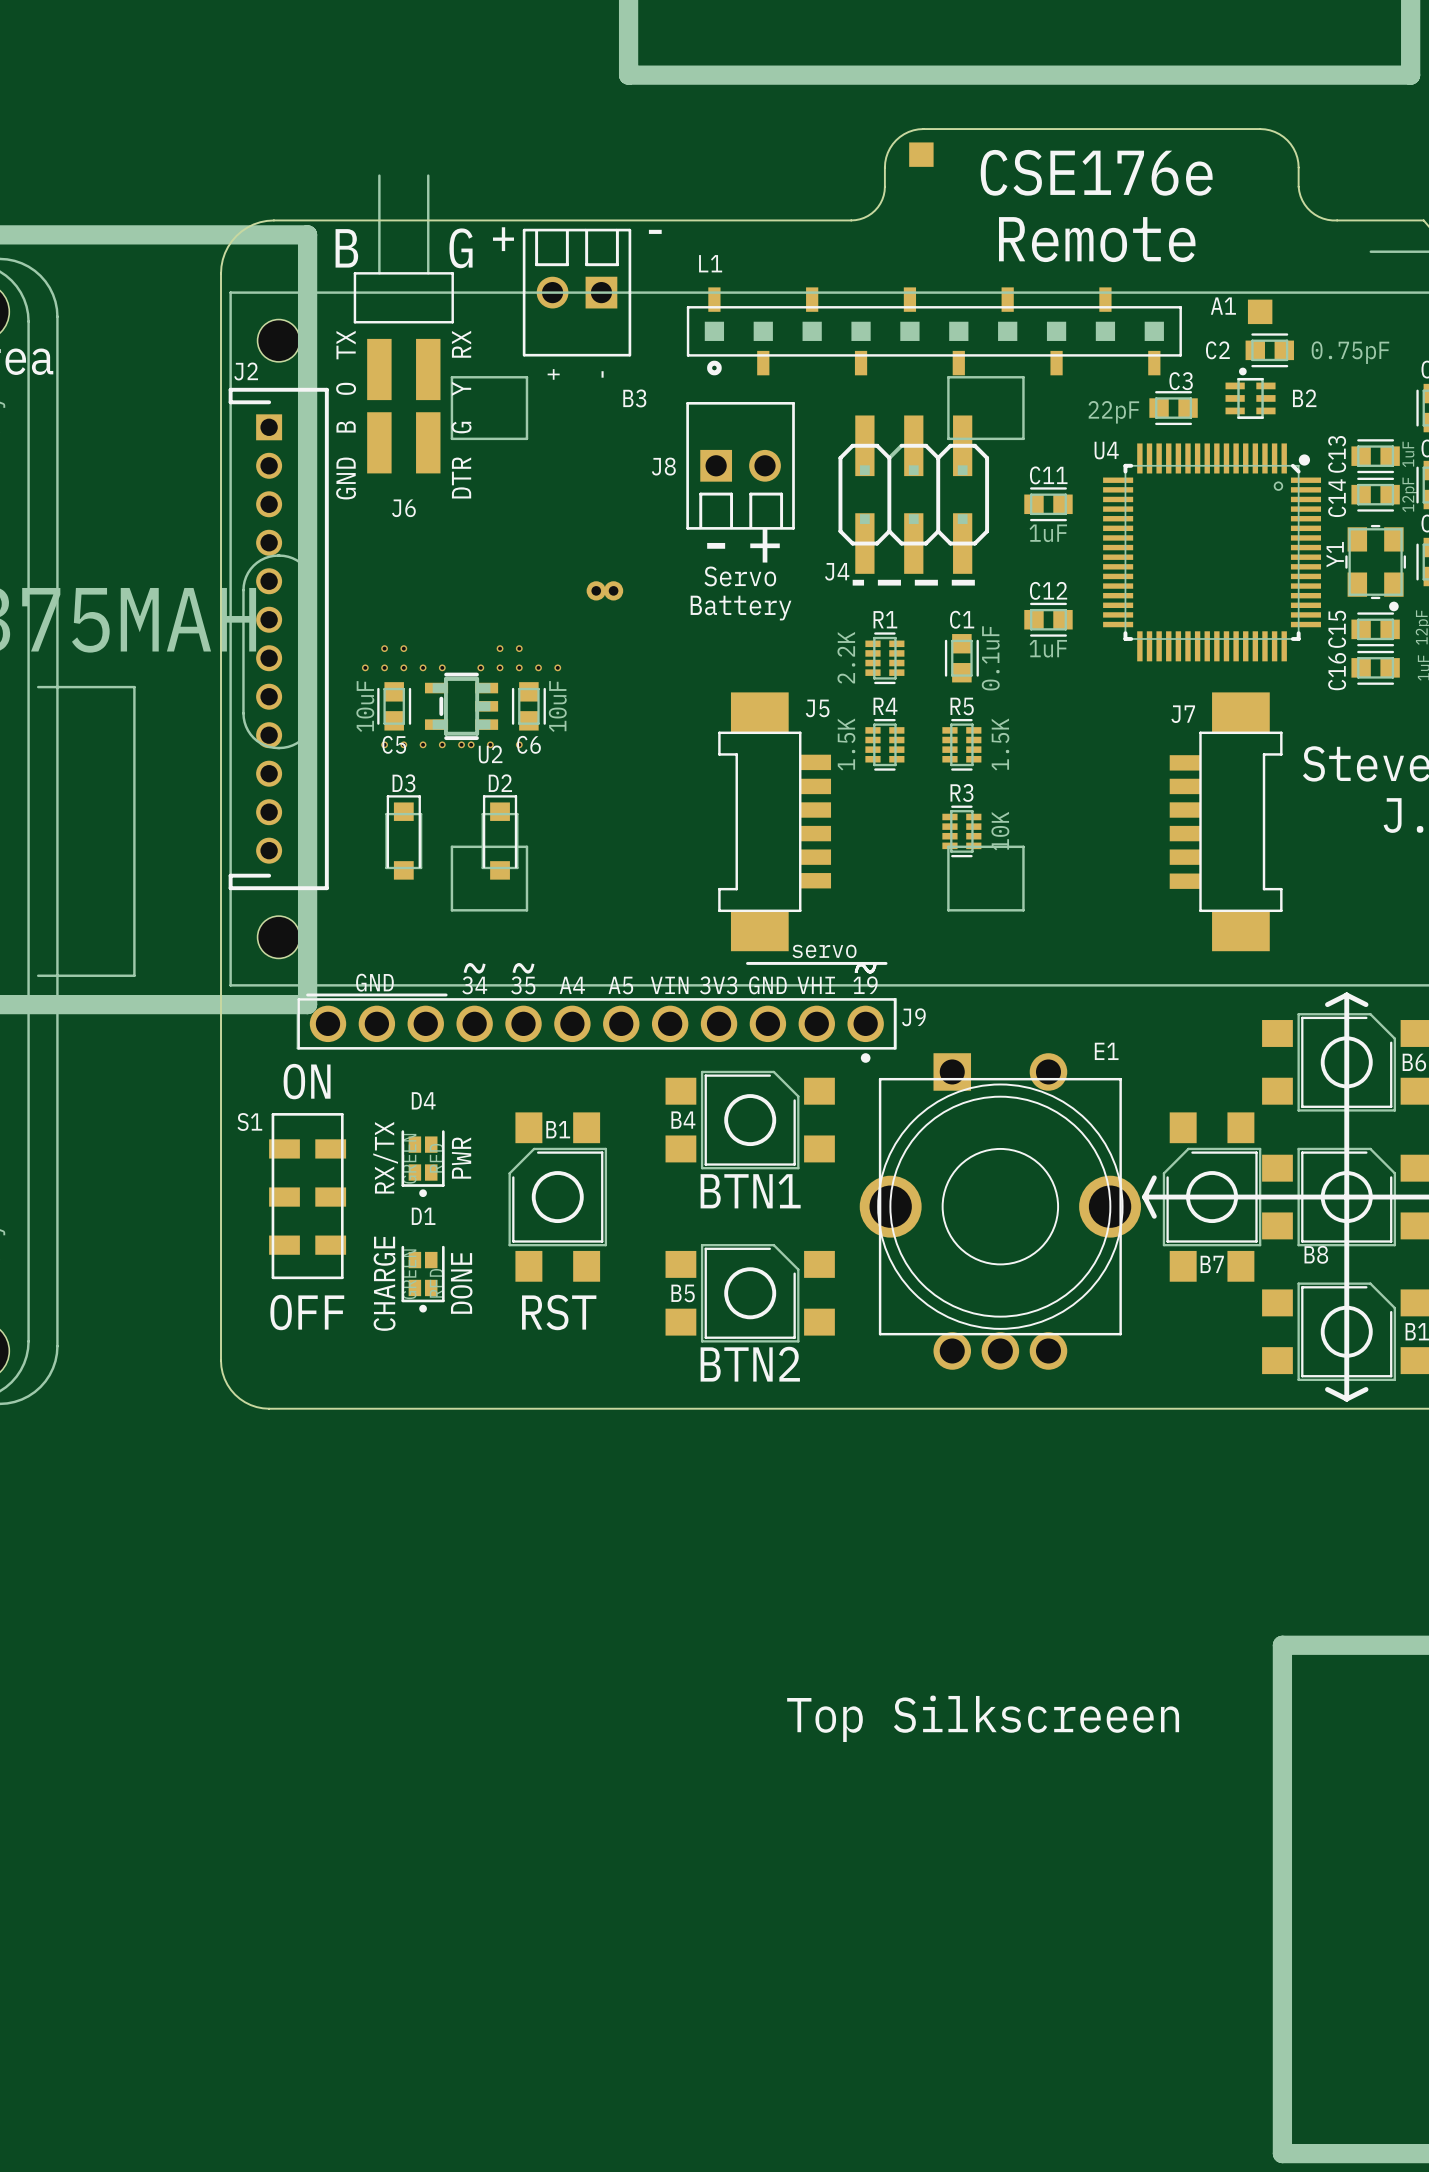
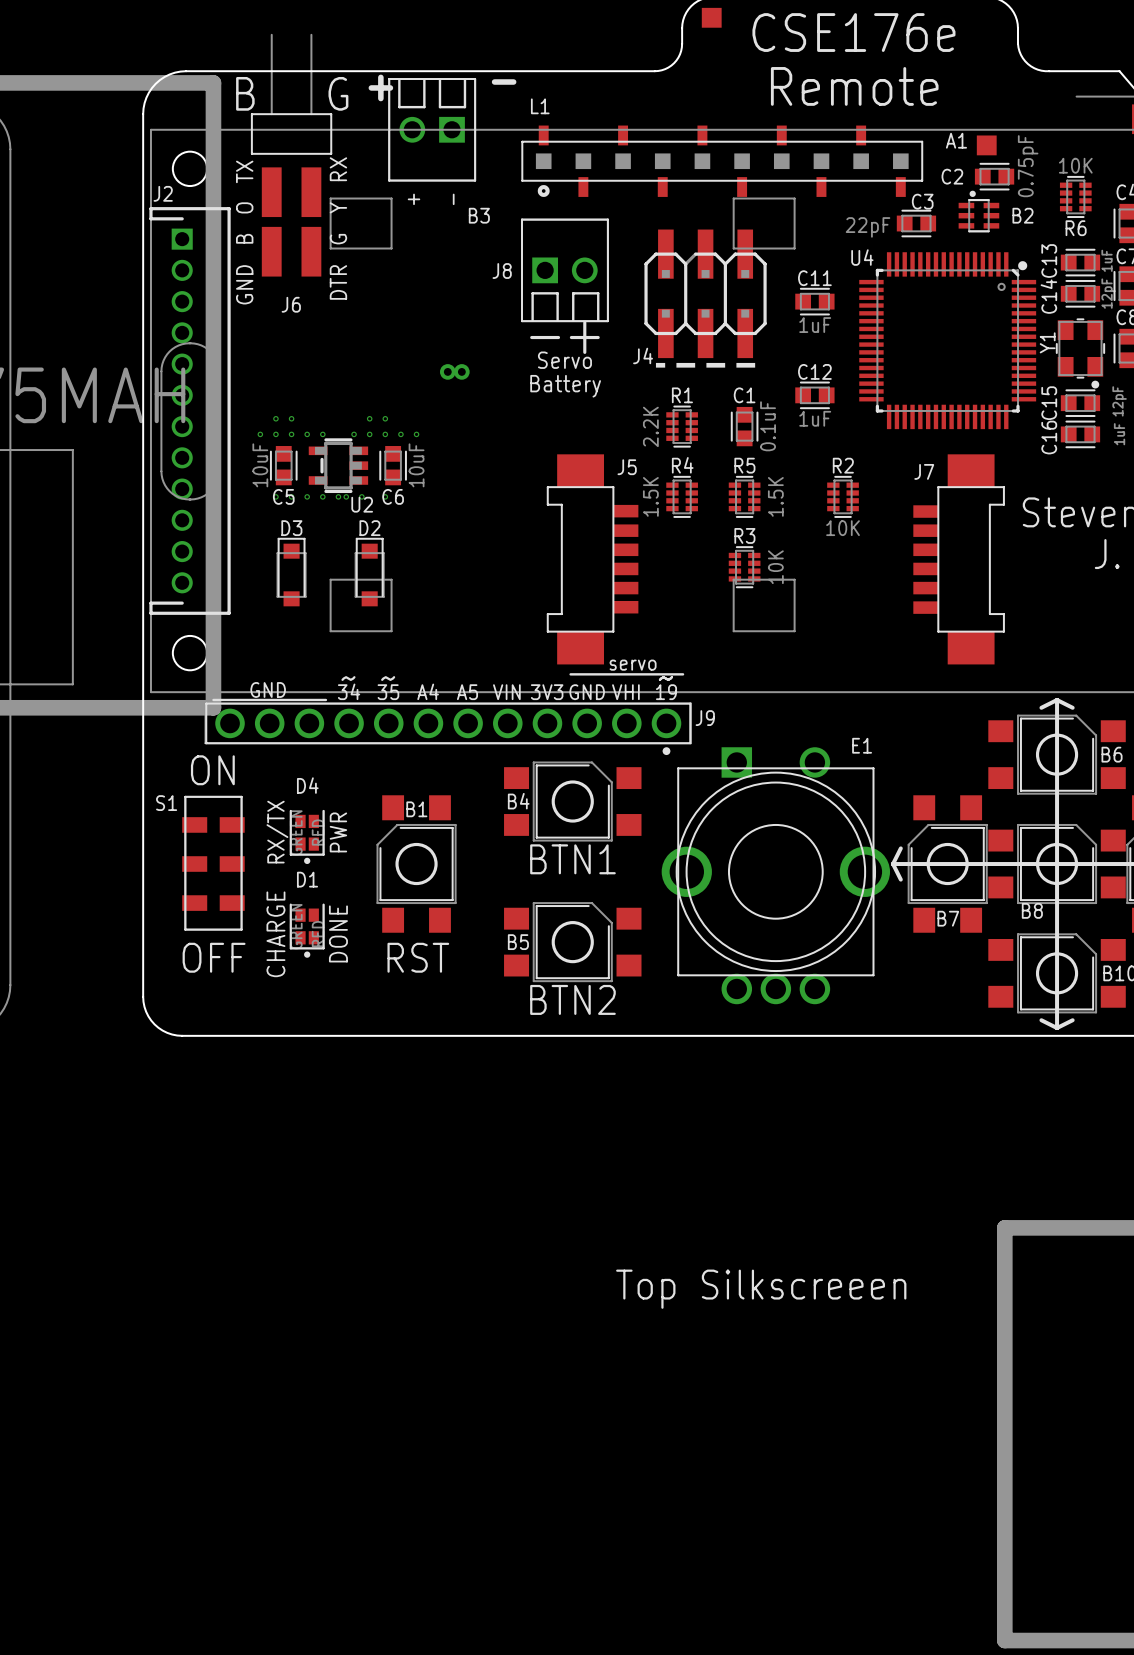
C2 value rotation: 0° (1350, 352) -> 90° counterclockwise (1028, 166)
R6: none -> 10K (1075, 196)
R2: none -> 10K (843, 496)

